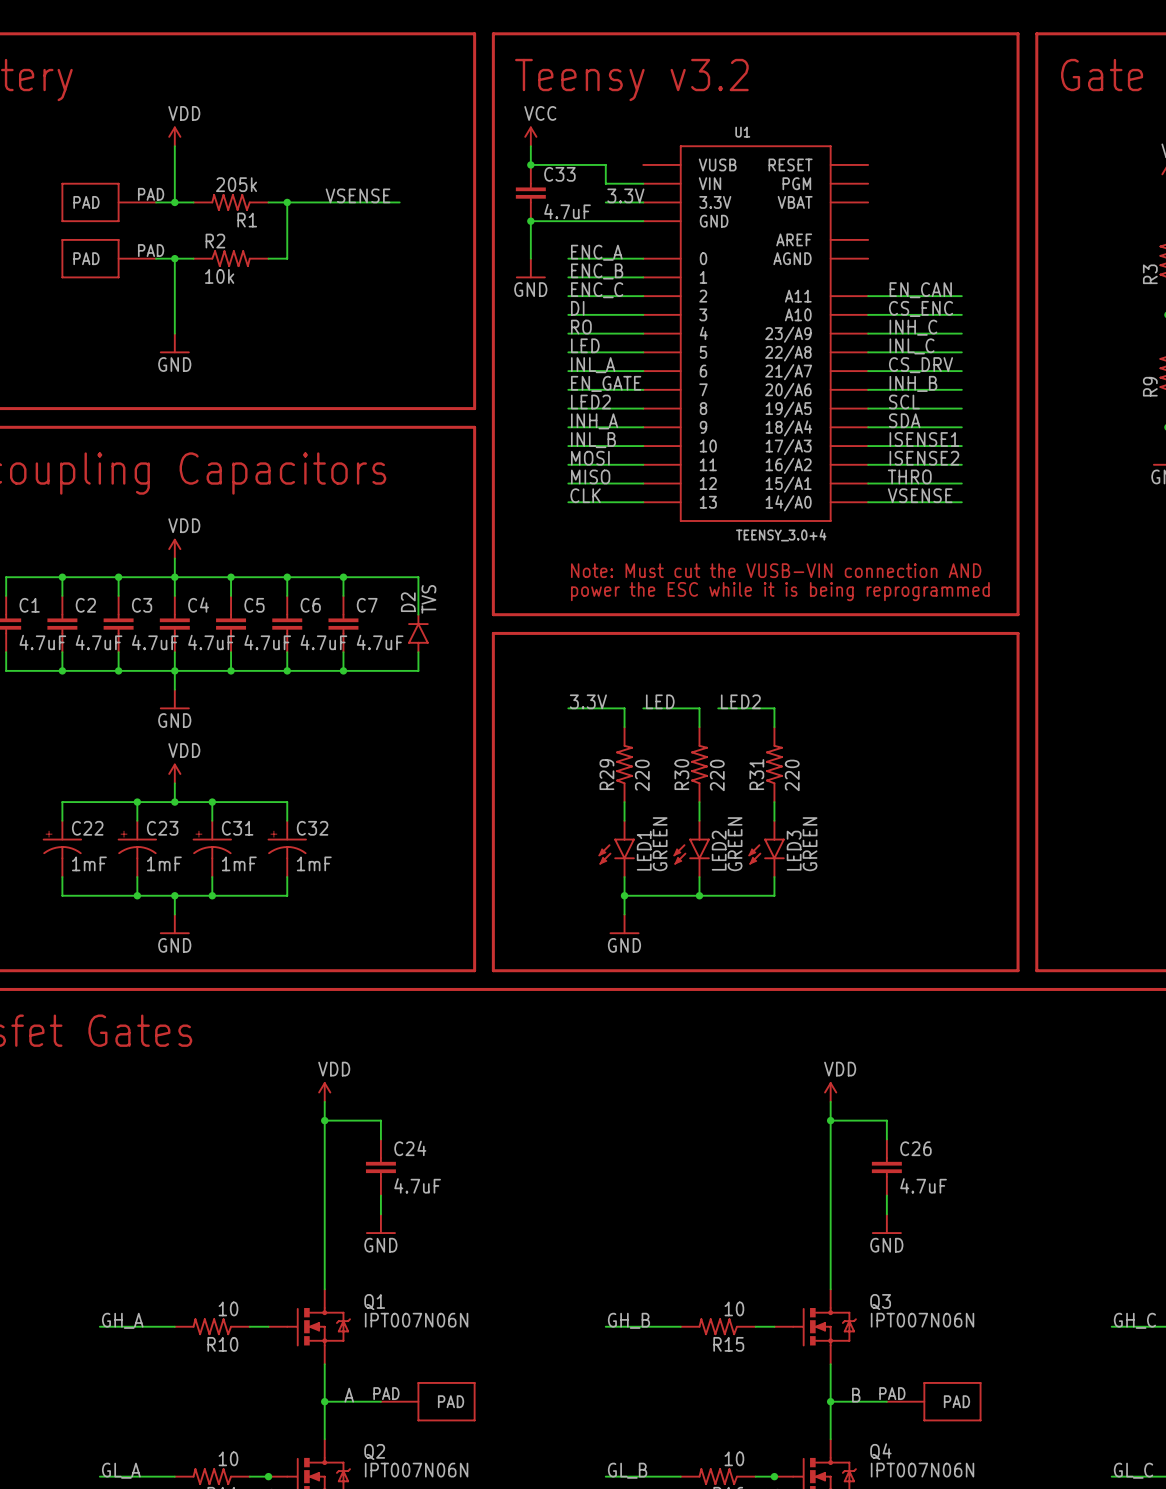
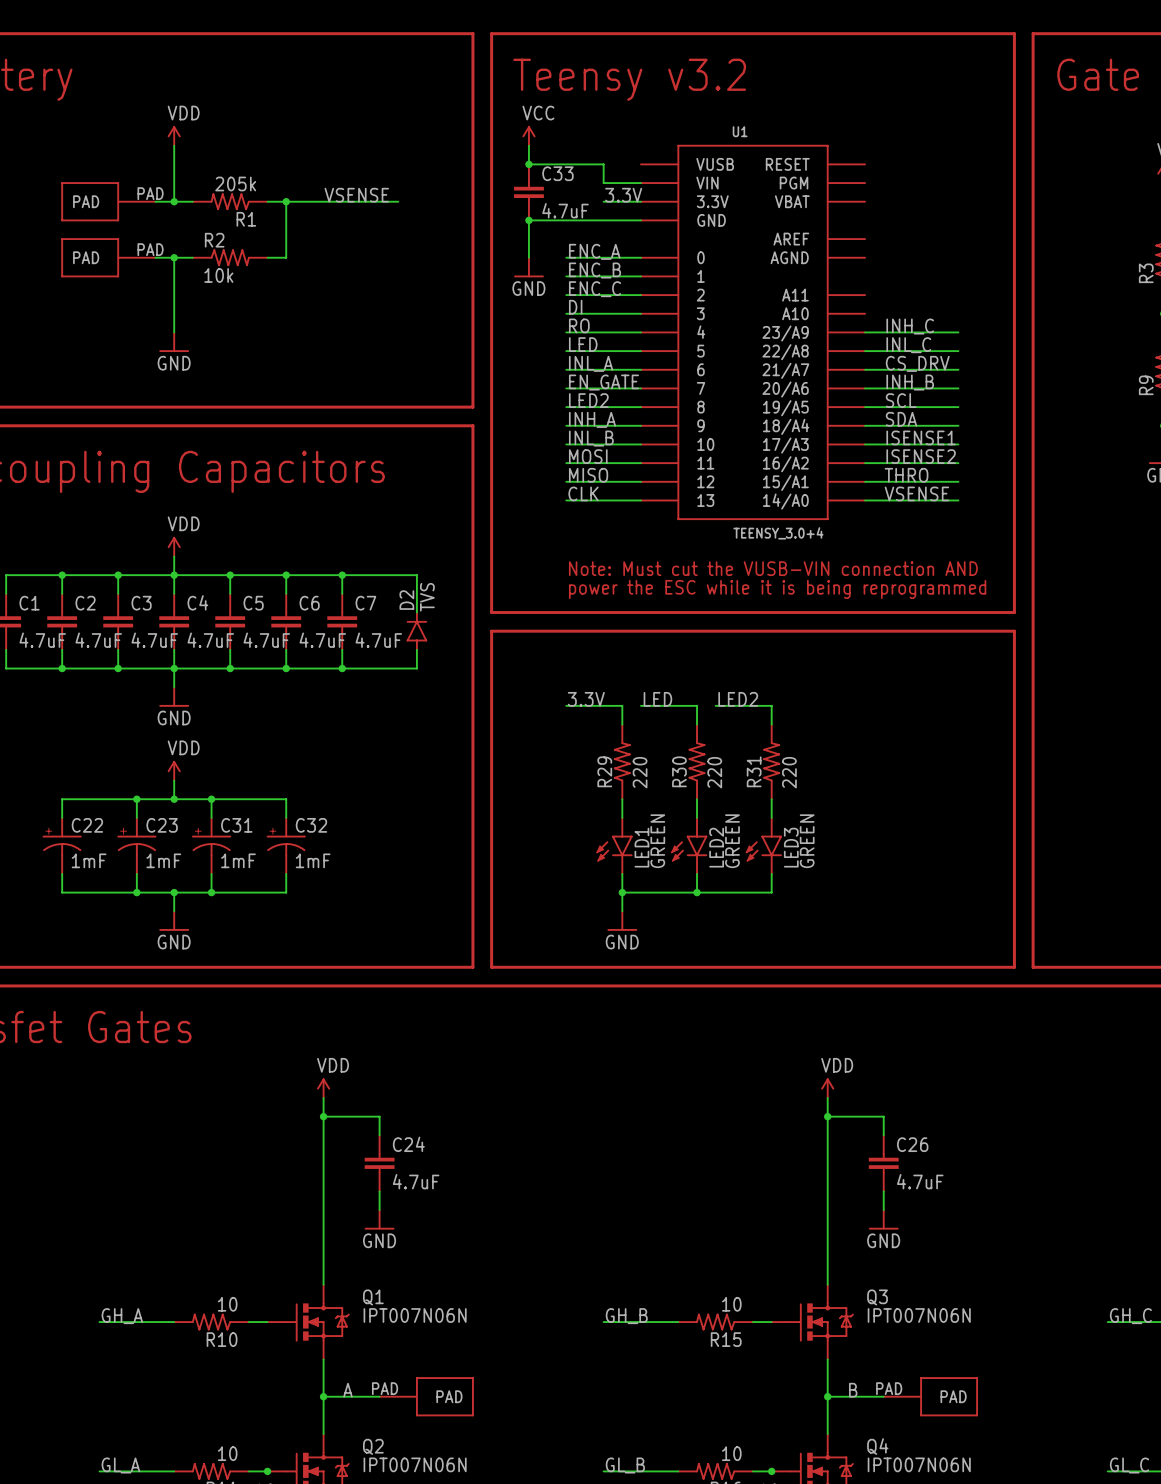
label: EN_CAN (920, 290) -> none
wire: (868, 296) (961, 296) -> none
label: CS_ENC (921, 308) -> none
wire: (868, 314) (961, 314) -> none

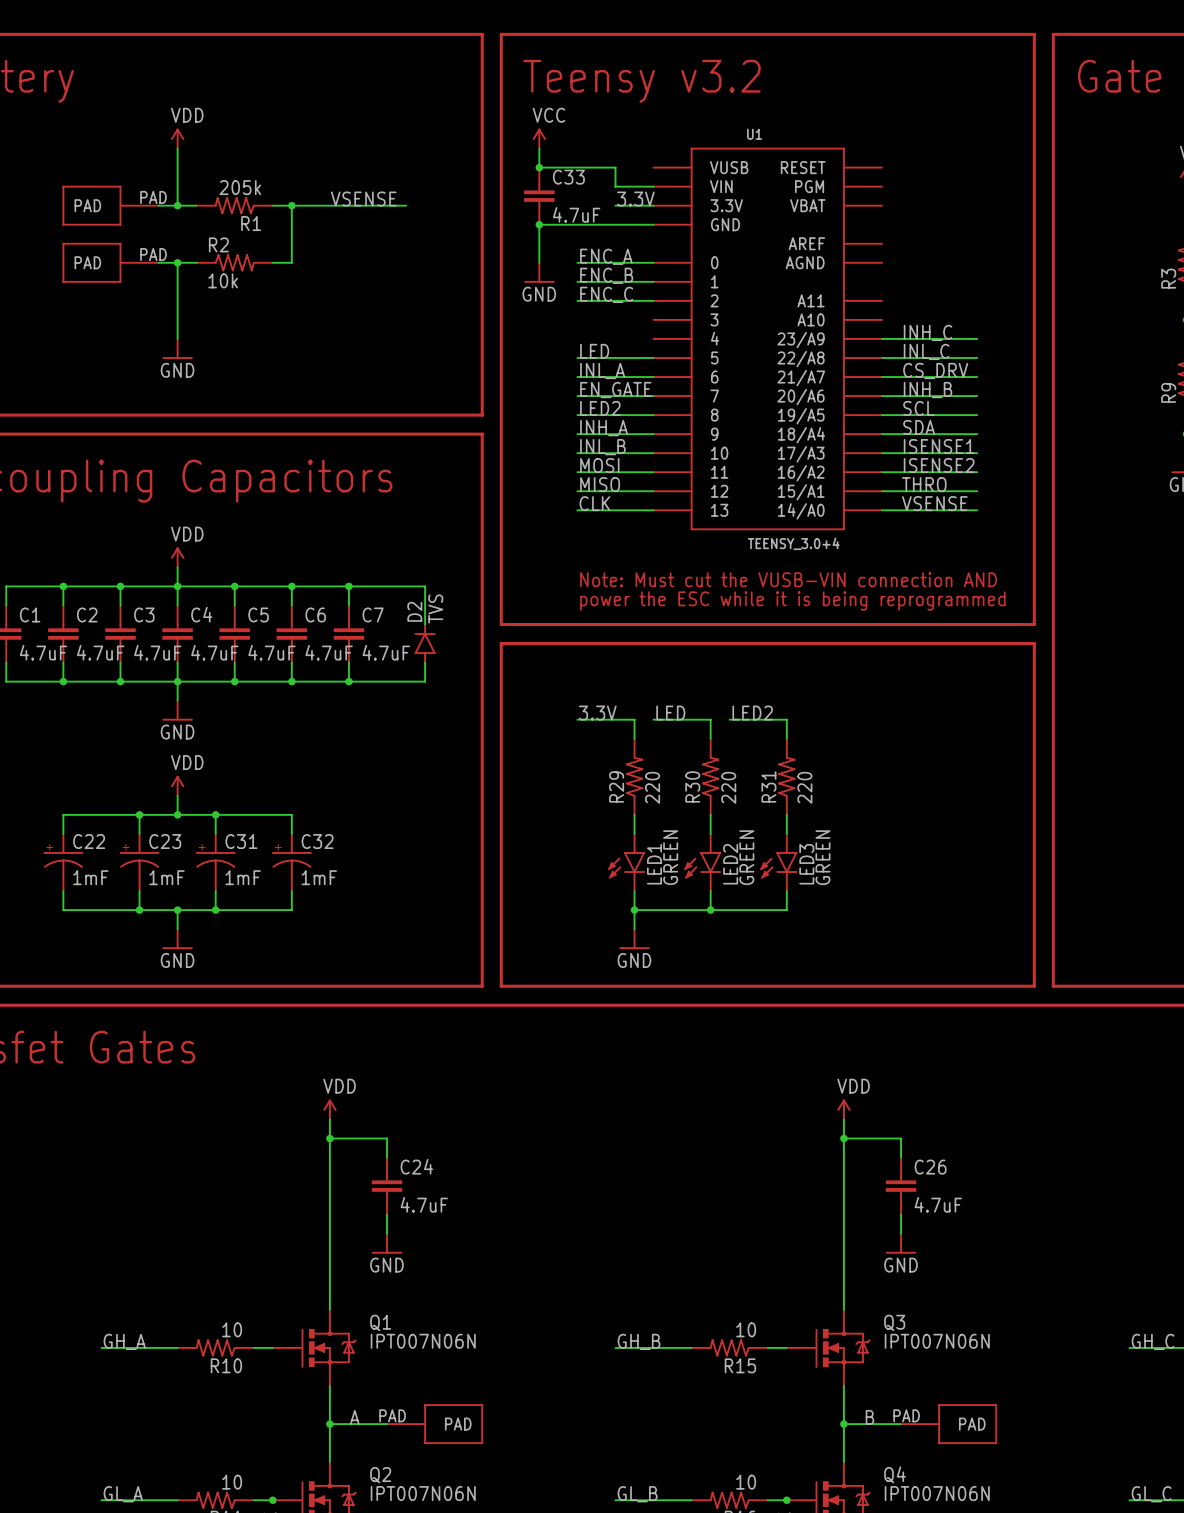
label: DI (575, 307) -> none
wire: (566, 313) (640, 313) -> none
label: RO (579, 325) -> none
wire: (566, 332) (640, 332) -> none

